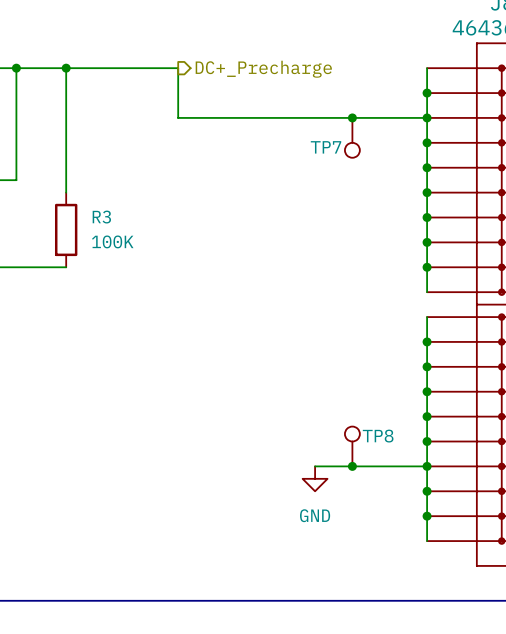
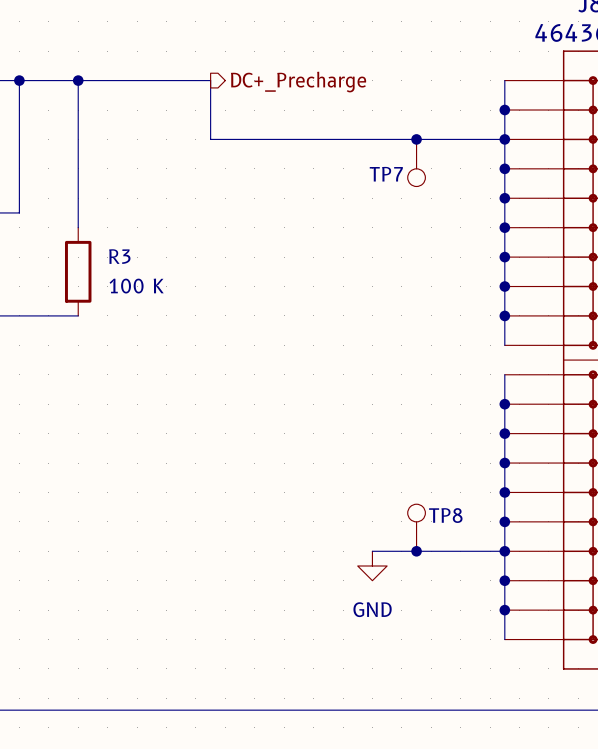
R3 value: 100K (112, 241) -> 100 K (136, 286)

